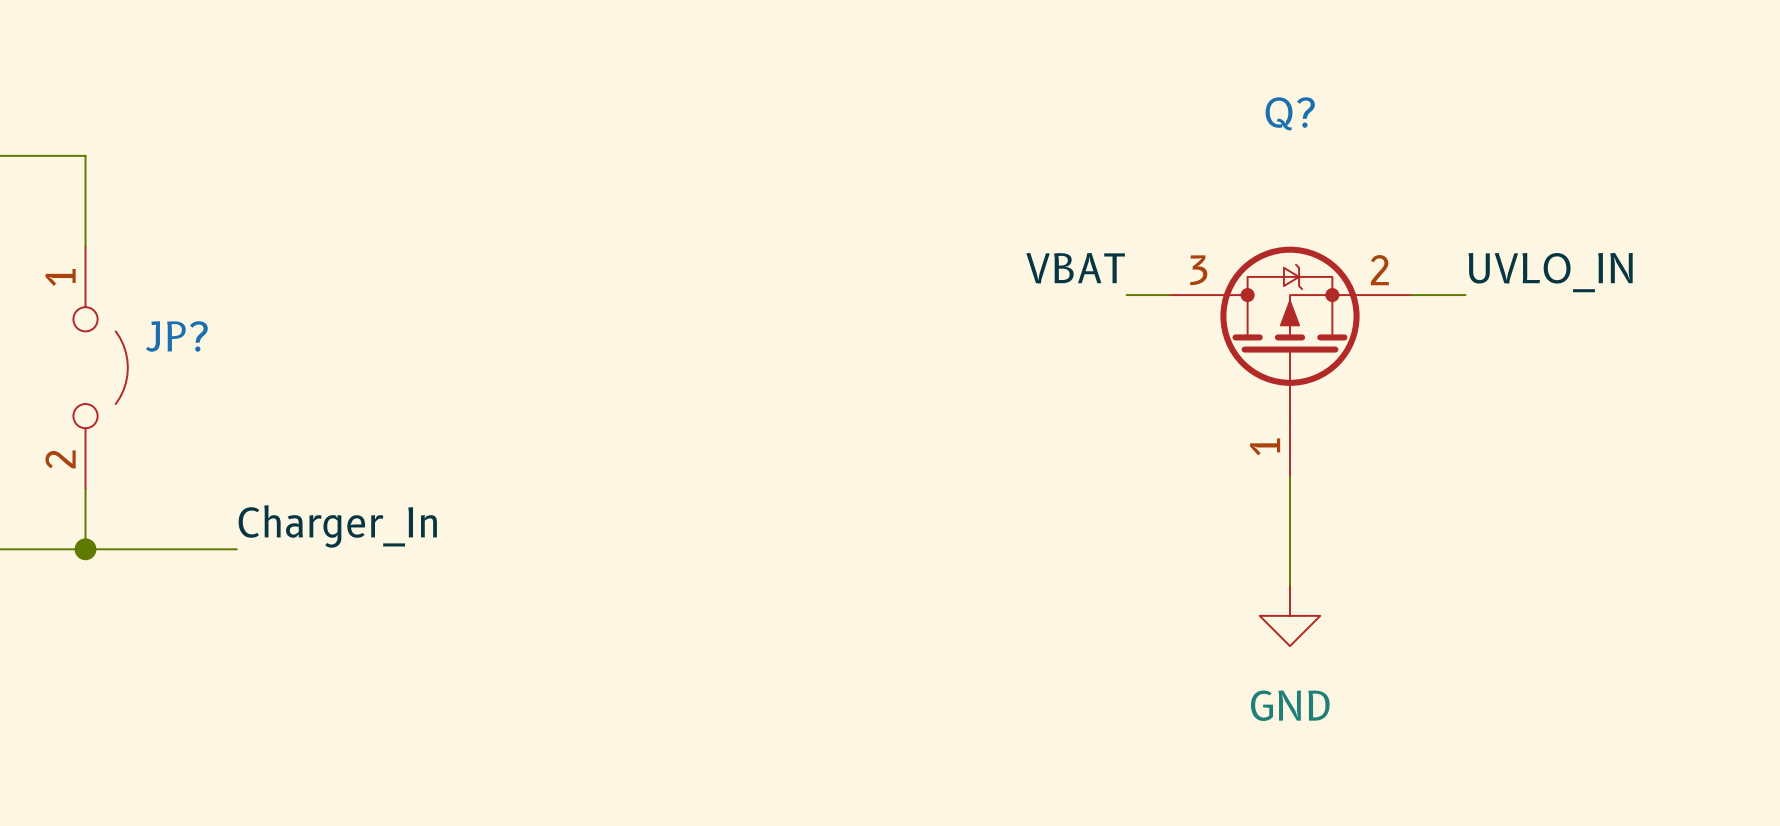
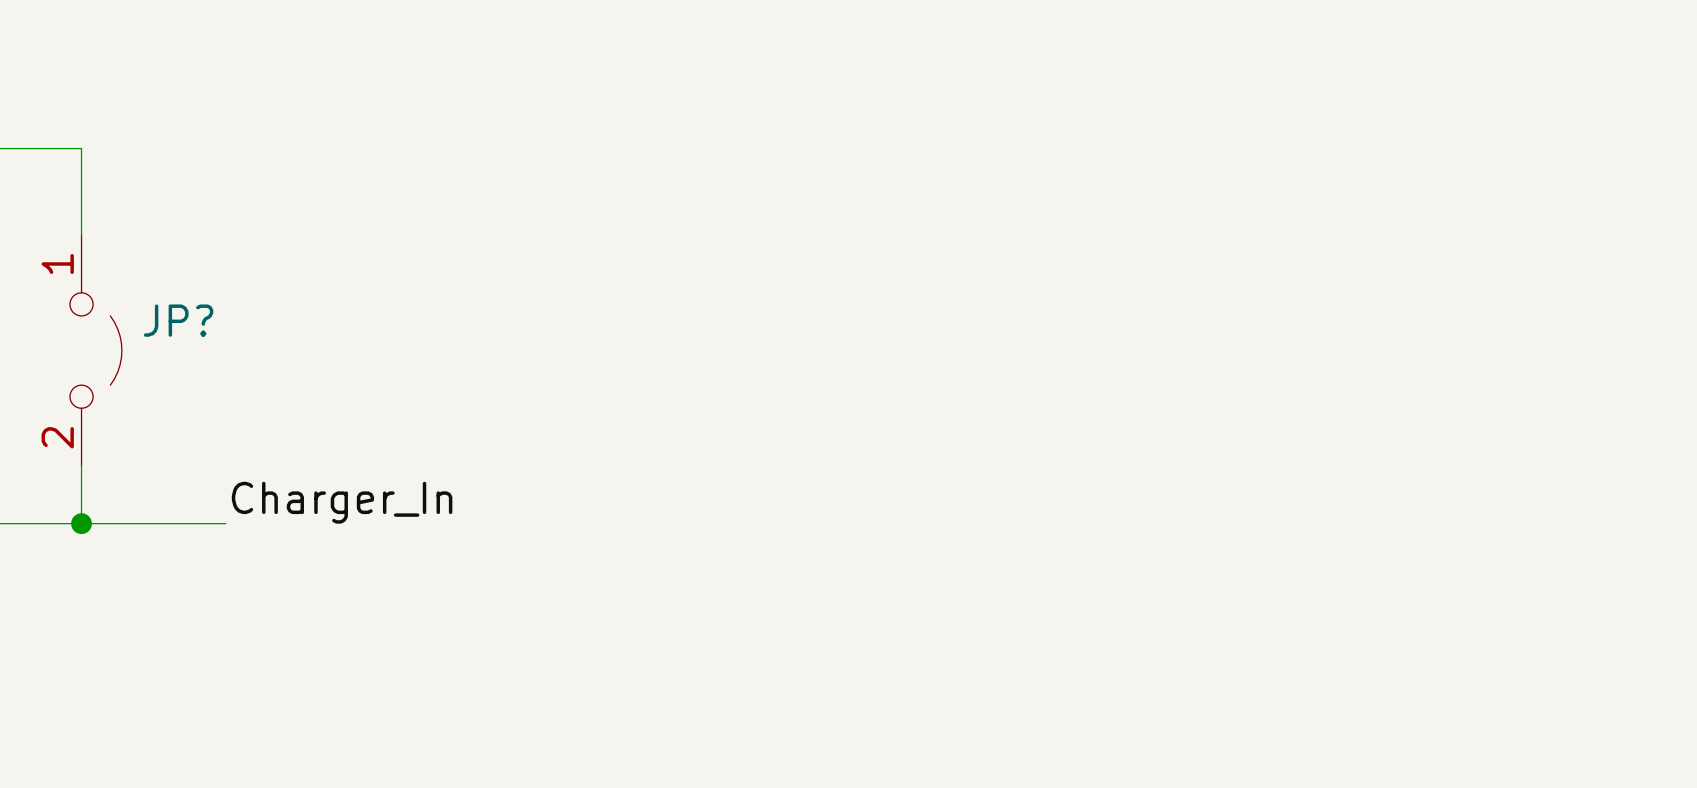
label: VBAT (1075, 268) -> none
label: UVLO_IN (1550, 272) -> none
wire: (1126, 295) (1168, 295) -> none
wire: (1411, 295) (1465, 295) -> none
Q?: (1289, 361) -> none
wire: (1289, 476) (1289, 585) -> none
power symbol: GND (1289, 615) -> none

